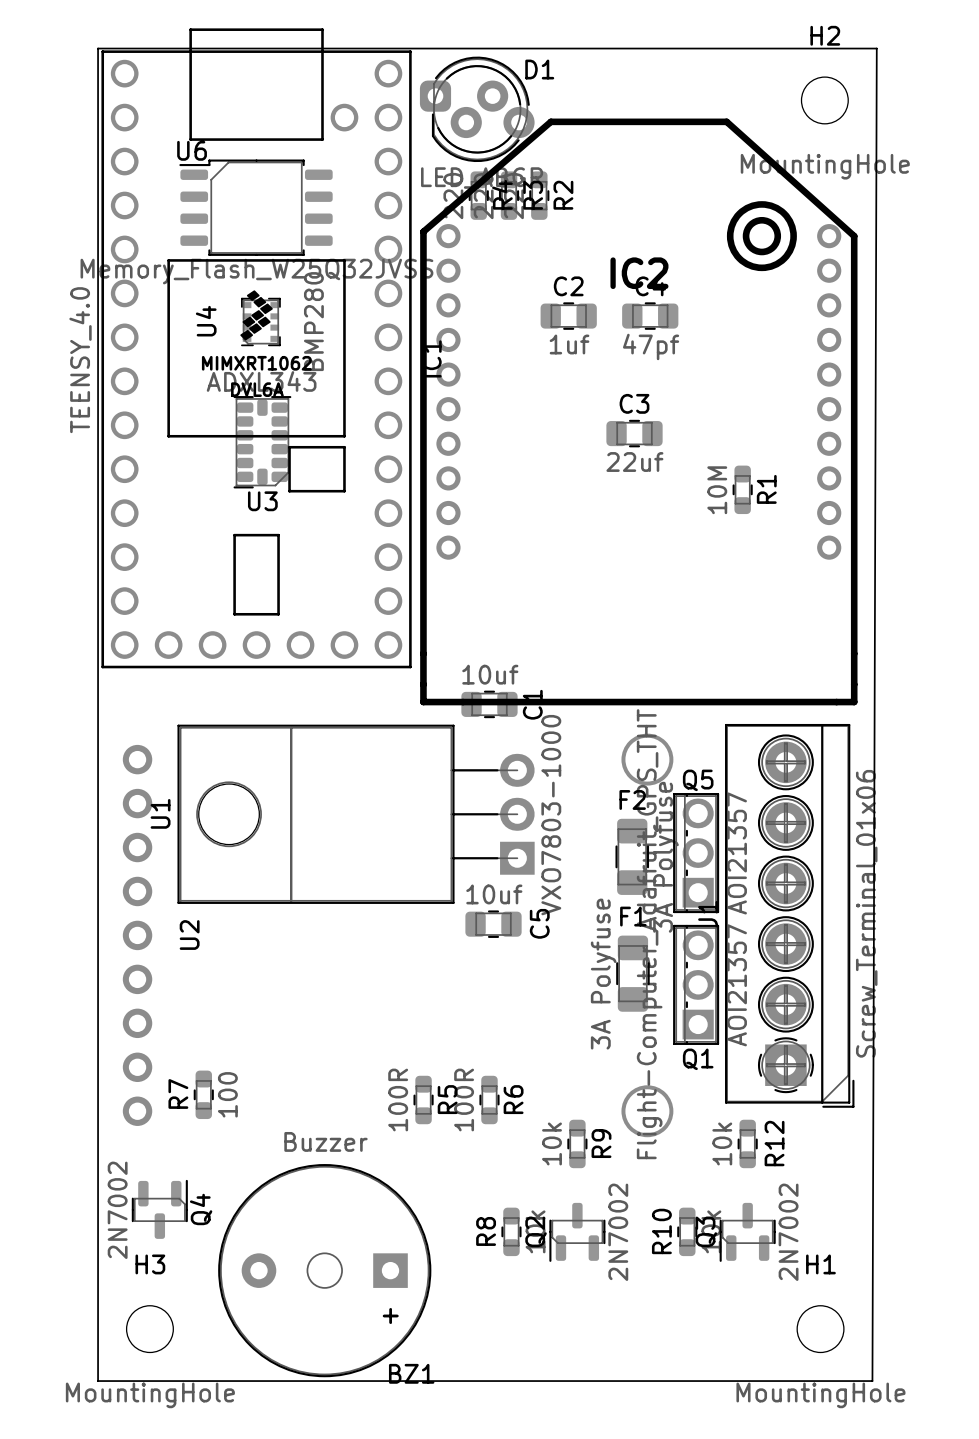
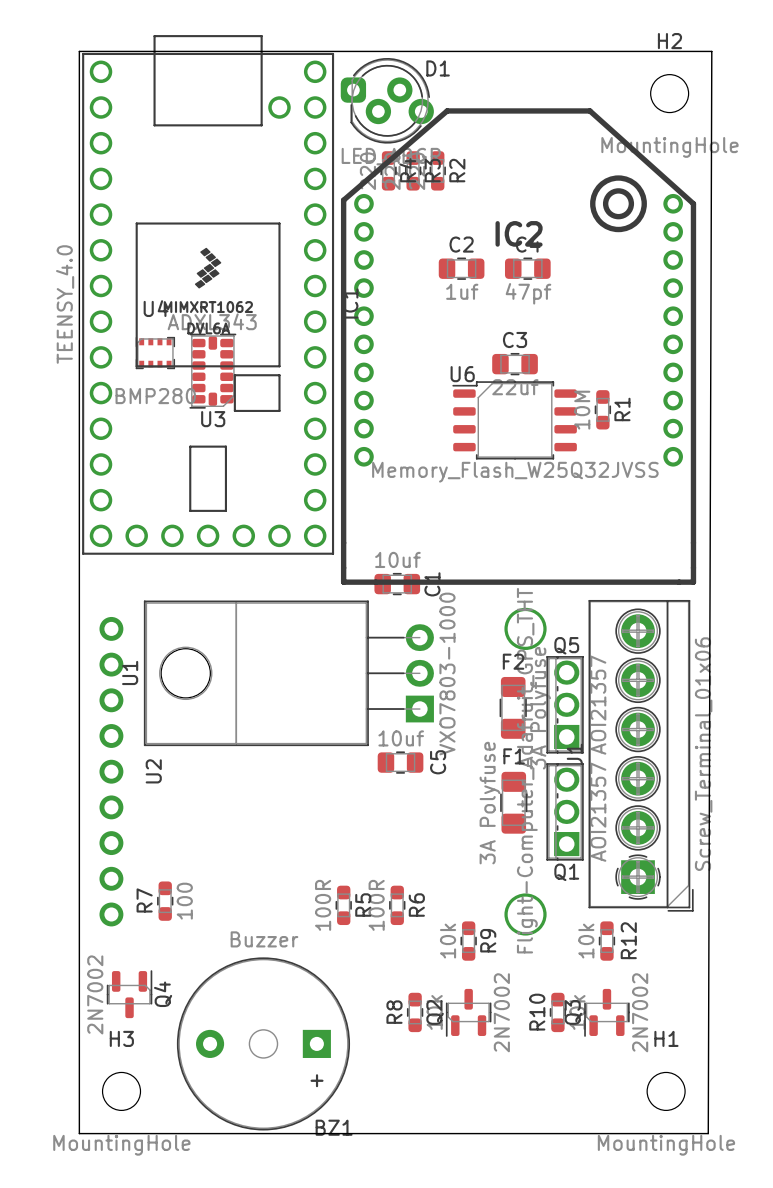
U6 position: (256, 207) -> (514, 420)
U4 rotation: 0° (260, 321) -> 90° clockwise (155, 353)
U4 position: (260, 321) -> (155, 353)

